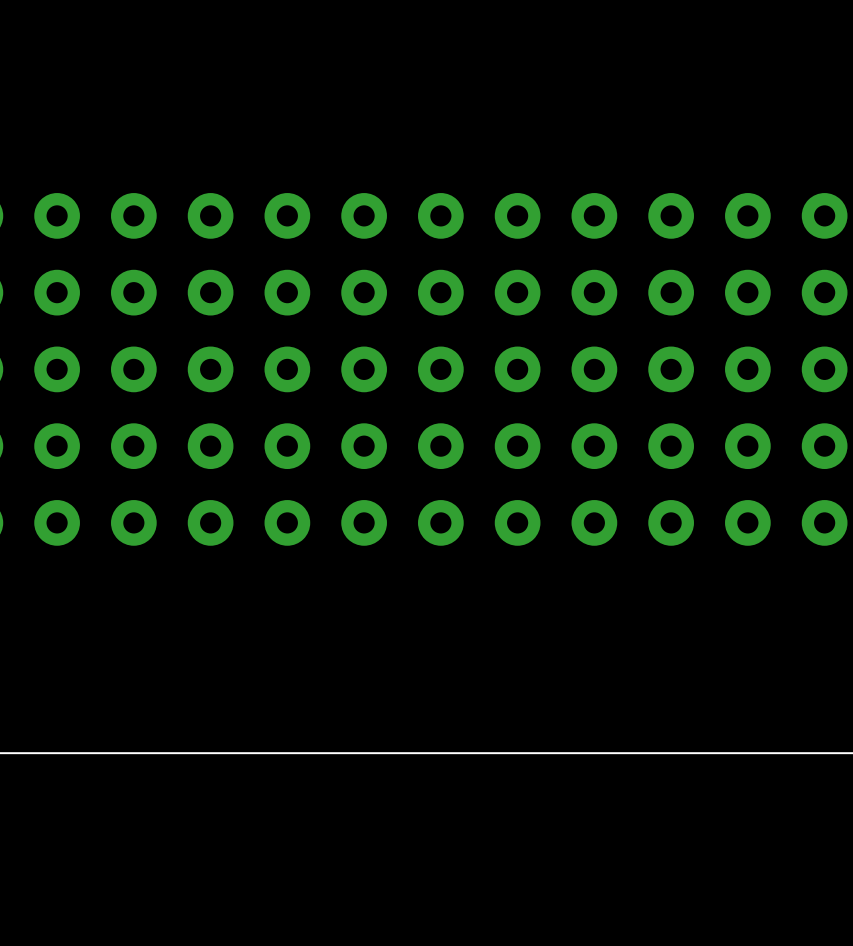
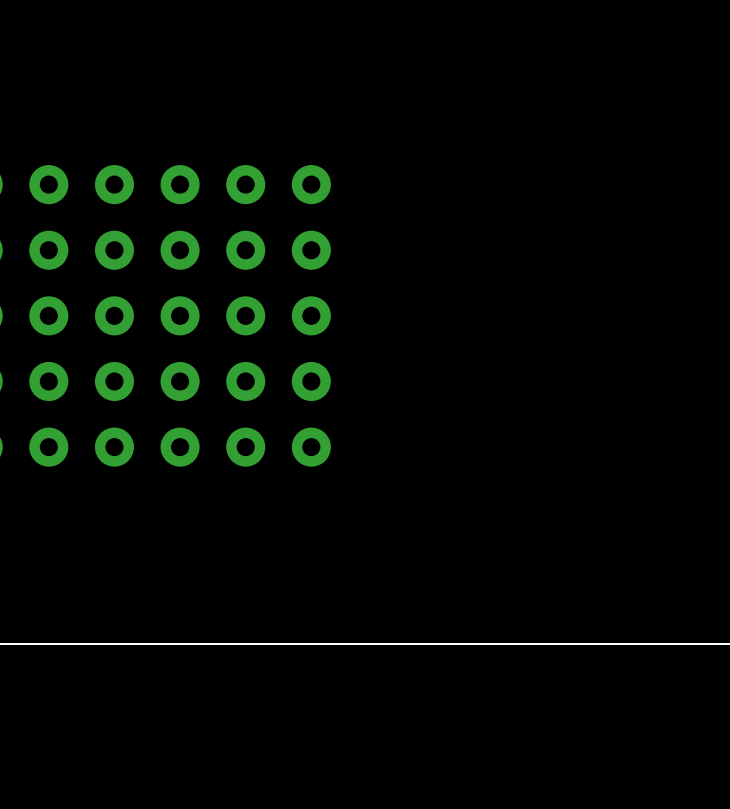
via: (440, 215) -> none
via: (517, 215) -> none
via: (594, 215) -> none
via: (671, 215) -> none
via: (747, 215) -> none
via: (824, 215) -> none
via: (440, 292) -> none
via: (517, 292) -> none
via: (594, 292) -> none
via: (671, 292) -> none
via: (747, 292) -> none
via: (824, 292) -> none
via: (440, 369) -> none
via: (517, 369) -> none
via: (594, 369) -> none
via: (671, 369) -> none
via: (747, 369) -> none
via: (824, 369) -> none
via: (440, 446) -> none
via: (517, 446) -> none
via: (594, 446) -> none
via: (671, 446) -> none
via: (747, 446) -> none
via: (824, 446) -> none
via: (440, 522) -> none
via: (517, 522) -> none
via: (594, 522) -> none
via: (671, 522) -> none
via: (747, 522) -> none
via: (824, 522) -> none

